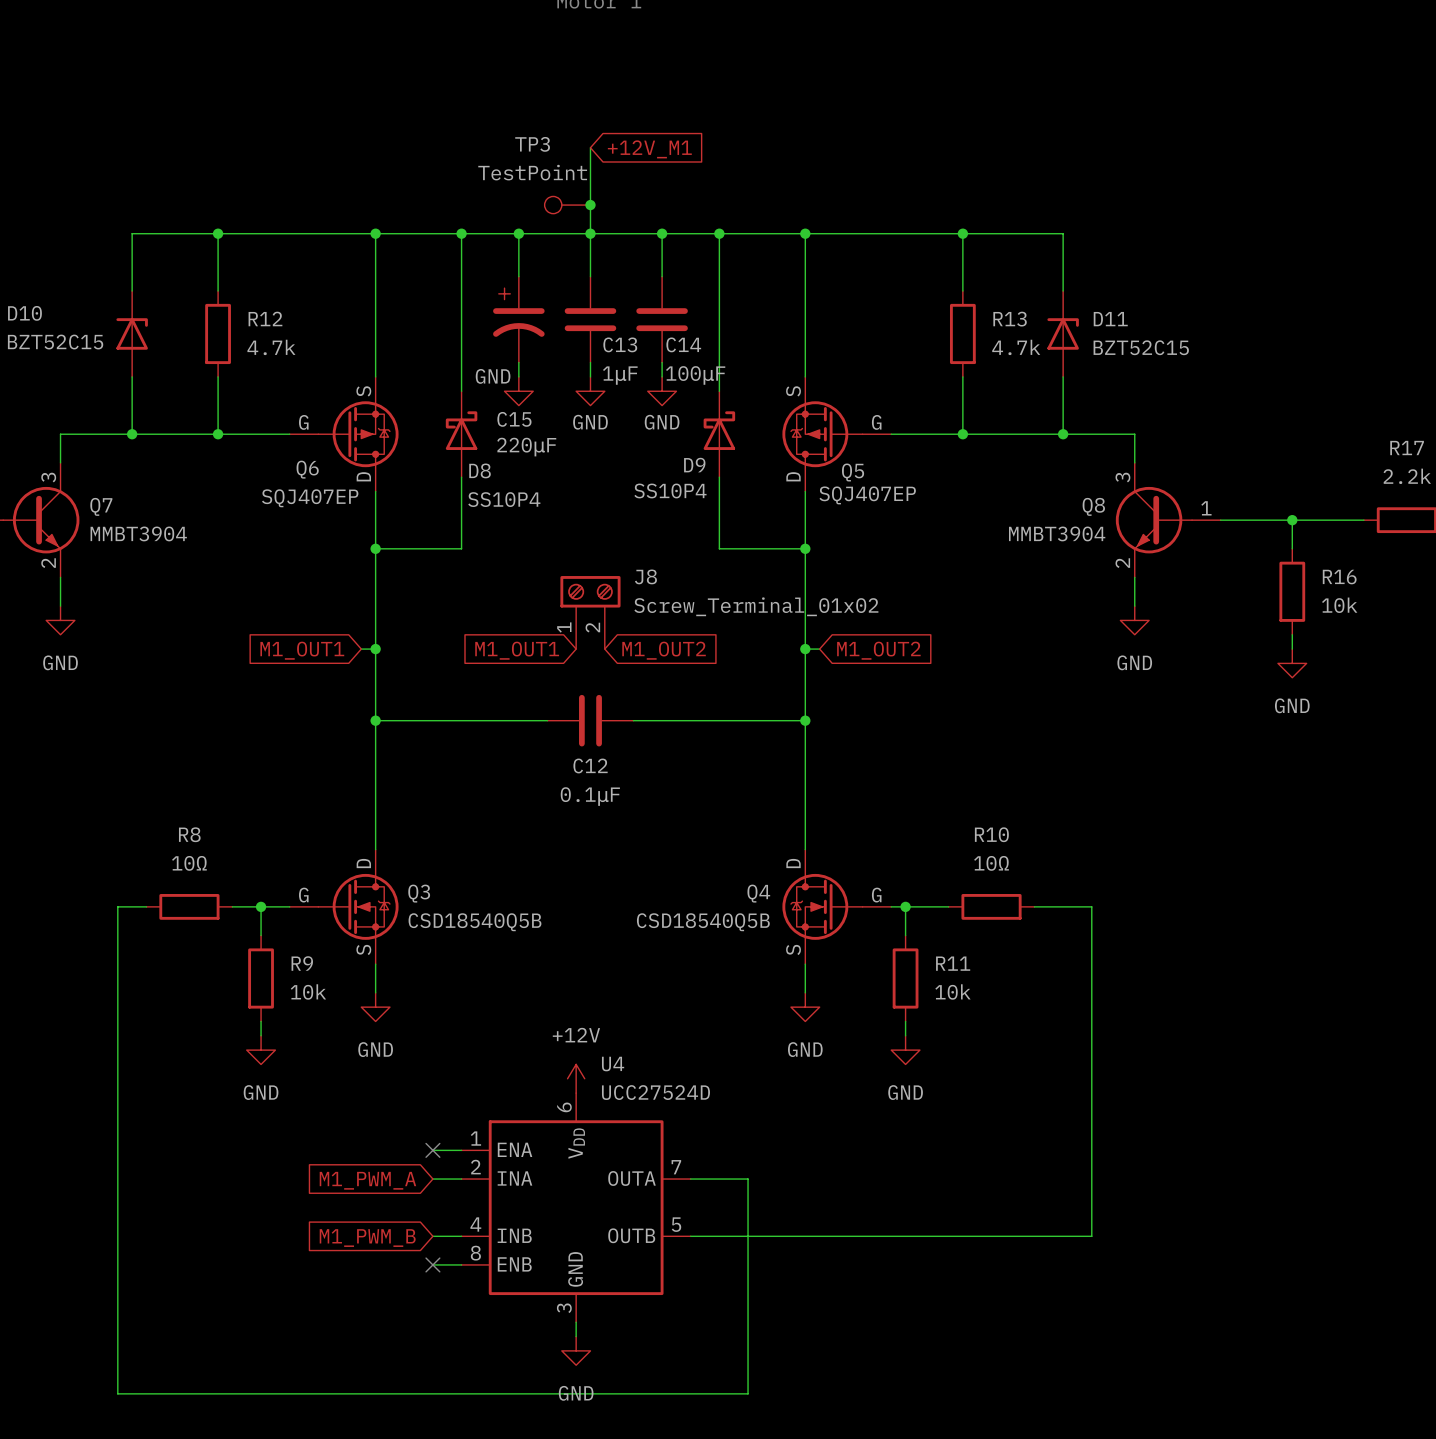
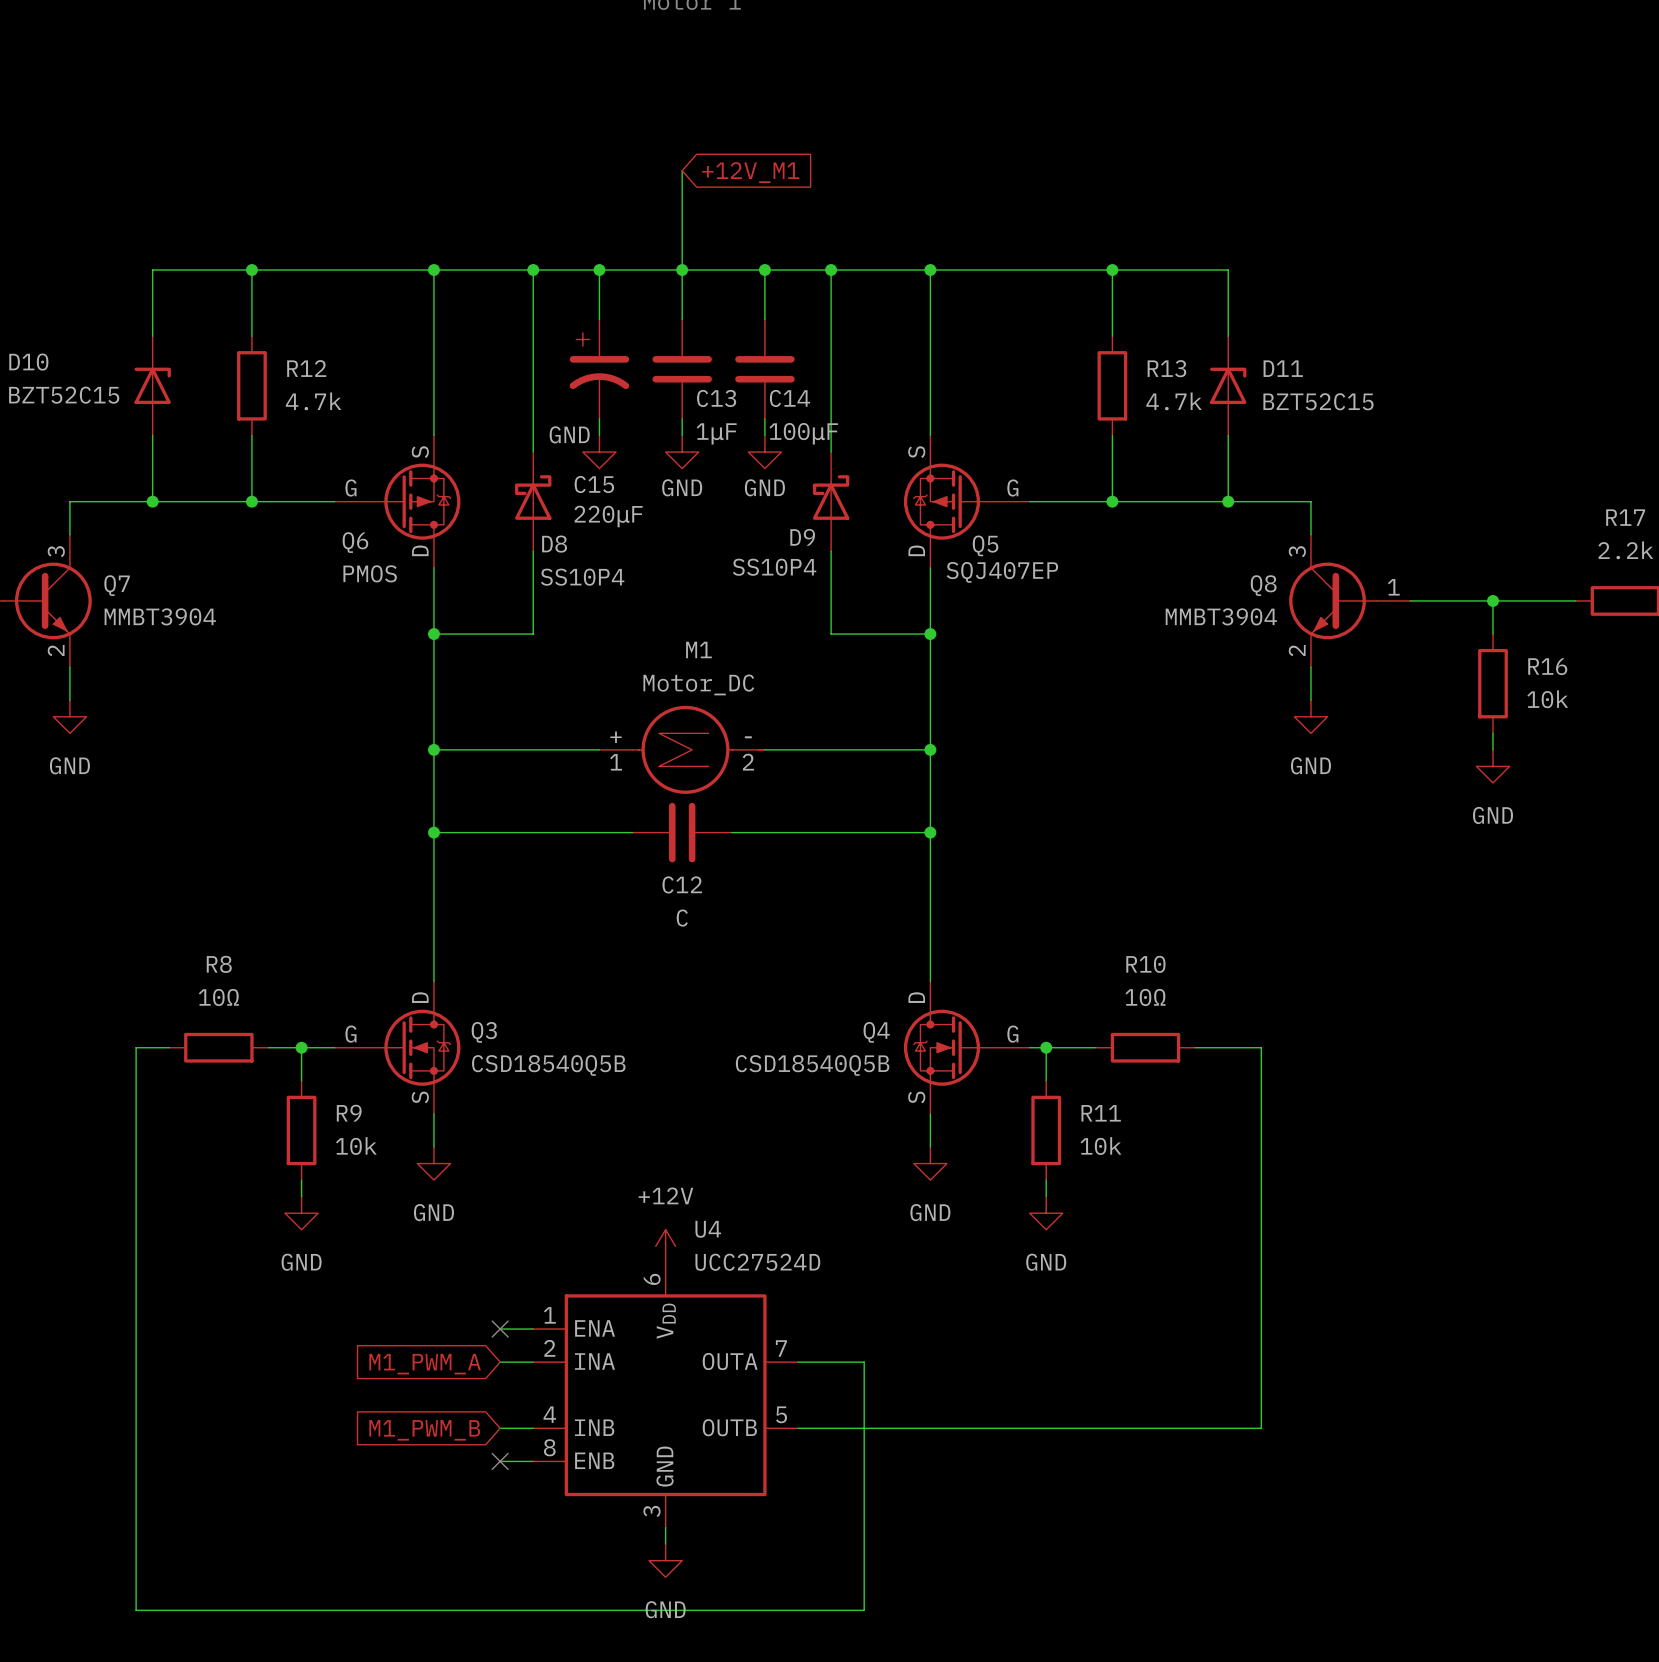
TP3: TestPoint (567, 205) -> none
junction: (590, 205) -> none
Q6 value: SQJ407EP (310, 498) -> PMOS (370, 573)
J8: Screw_Terminal_01x02 (590, 612) -> none
wire: (361, 649) (375, 649) -> (599, 749) (433, 749)
M1: none -> Motor_DC (682, 749)
wire: (805, 649) (819, 649) -> (930, 749) (764, 749)
global label: M1_OUT1 (302, 650) -> none
global label: M1_OUT1 (517, 650) -> none
global label: M1_OUT2 (664, 650) -> none
global label: M1_OUT2 (878, 650) -> none
C12 value: 0.1μF (590, 796) -> C (682, 918)

